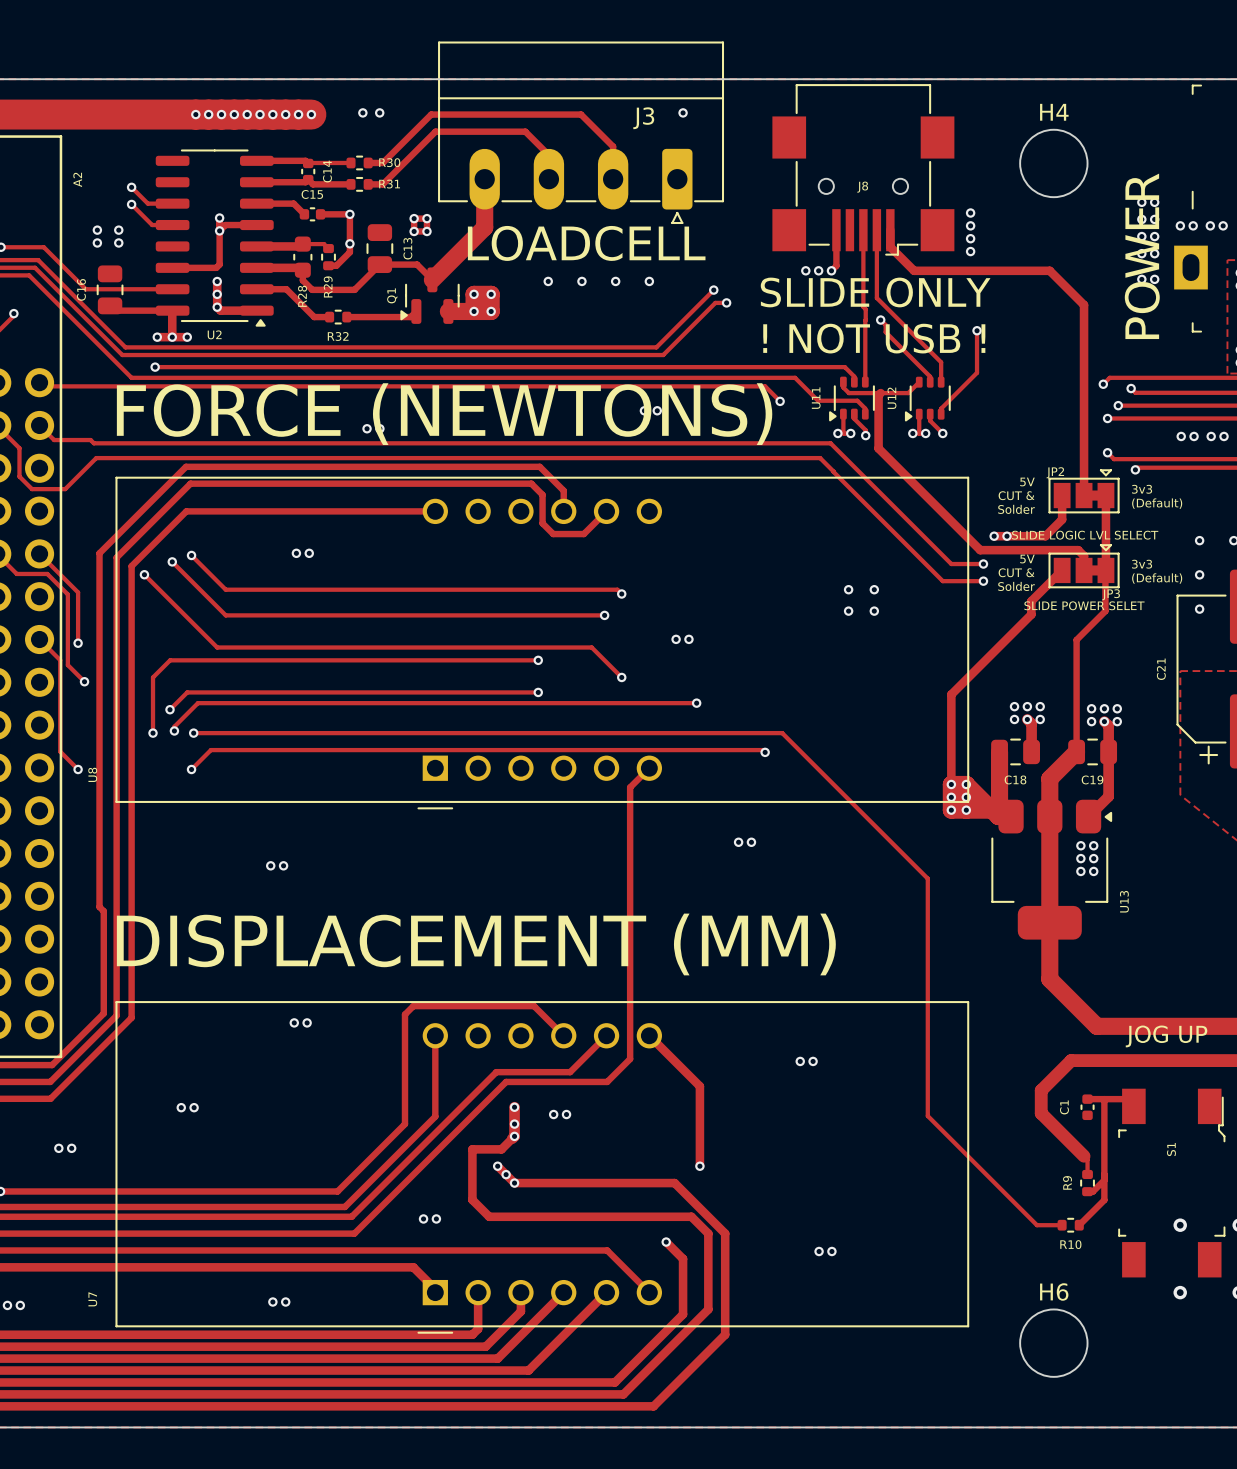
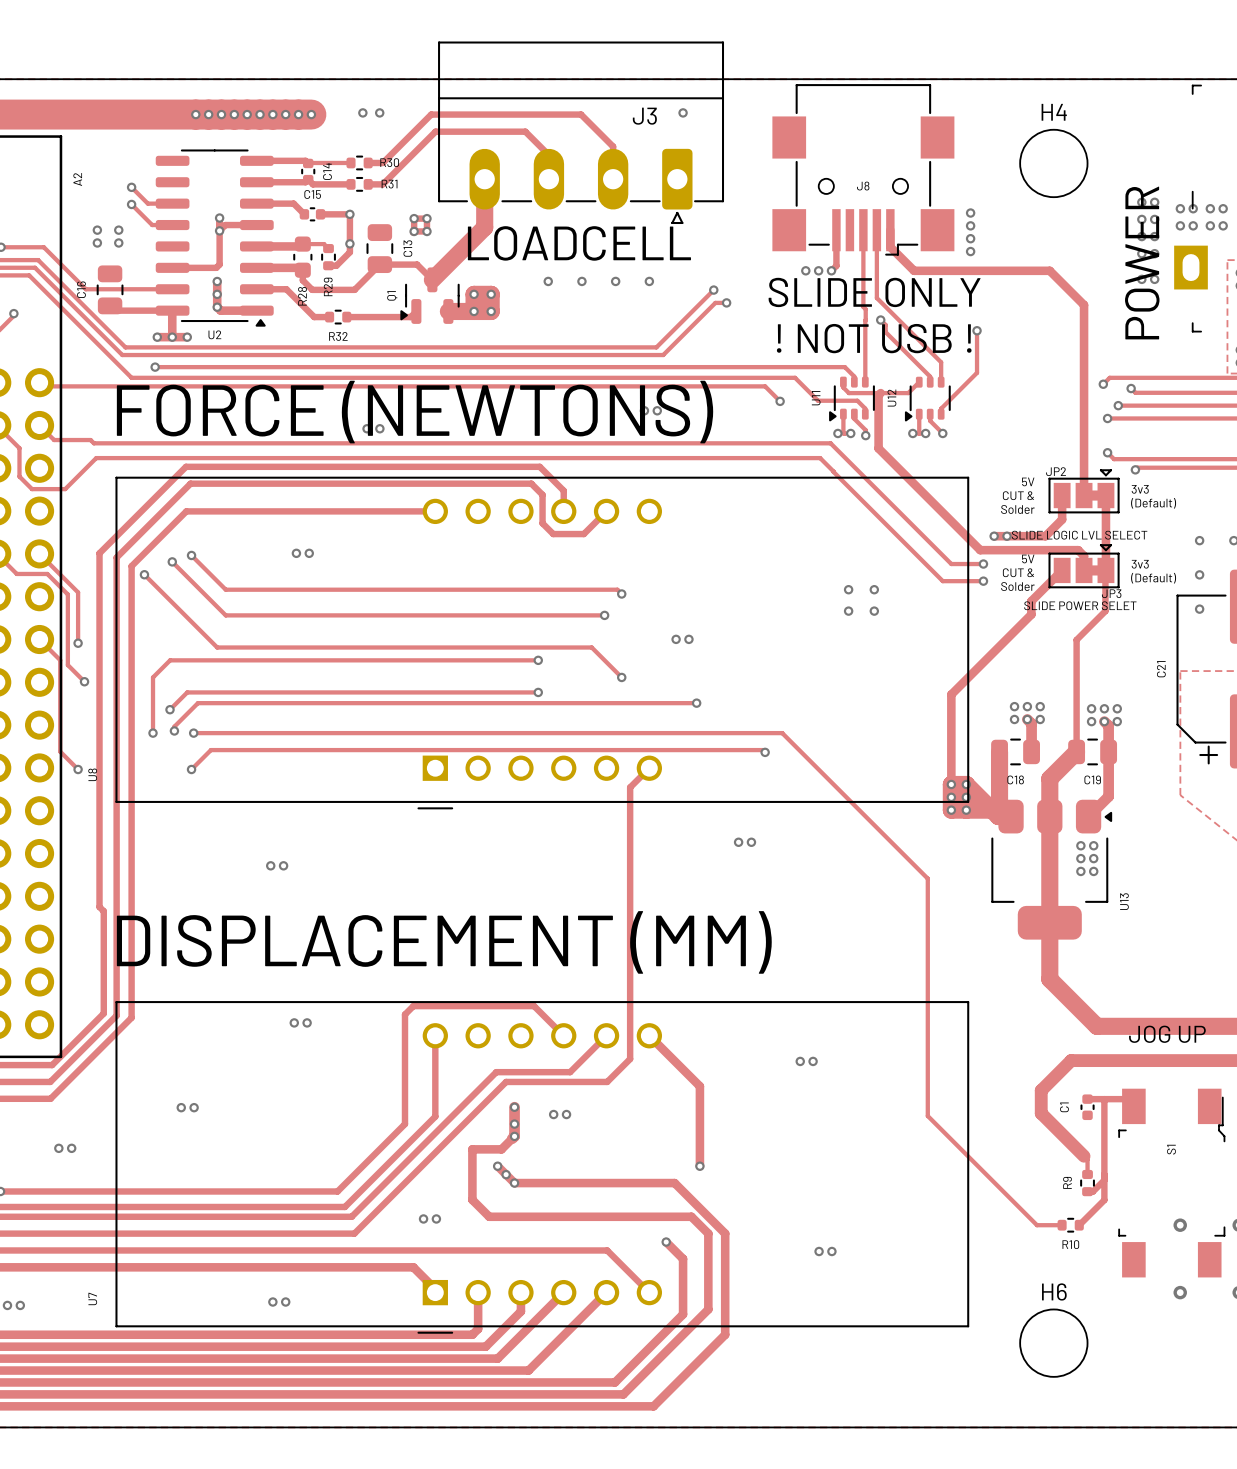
via: none -> (1180, 208)
via: none -> (1193, 208)
via: none -> (1210, 208)
via: none -> (1223, 208)
via: (1181, 436) -> none
via: (1194, 436) -> none
via: (1211, 436) -> none
via: (1224, 436) -> none

